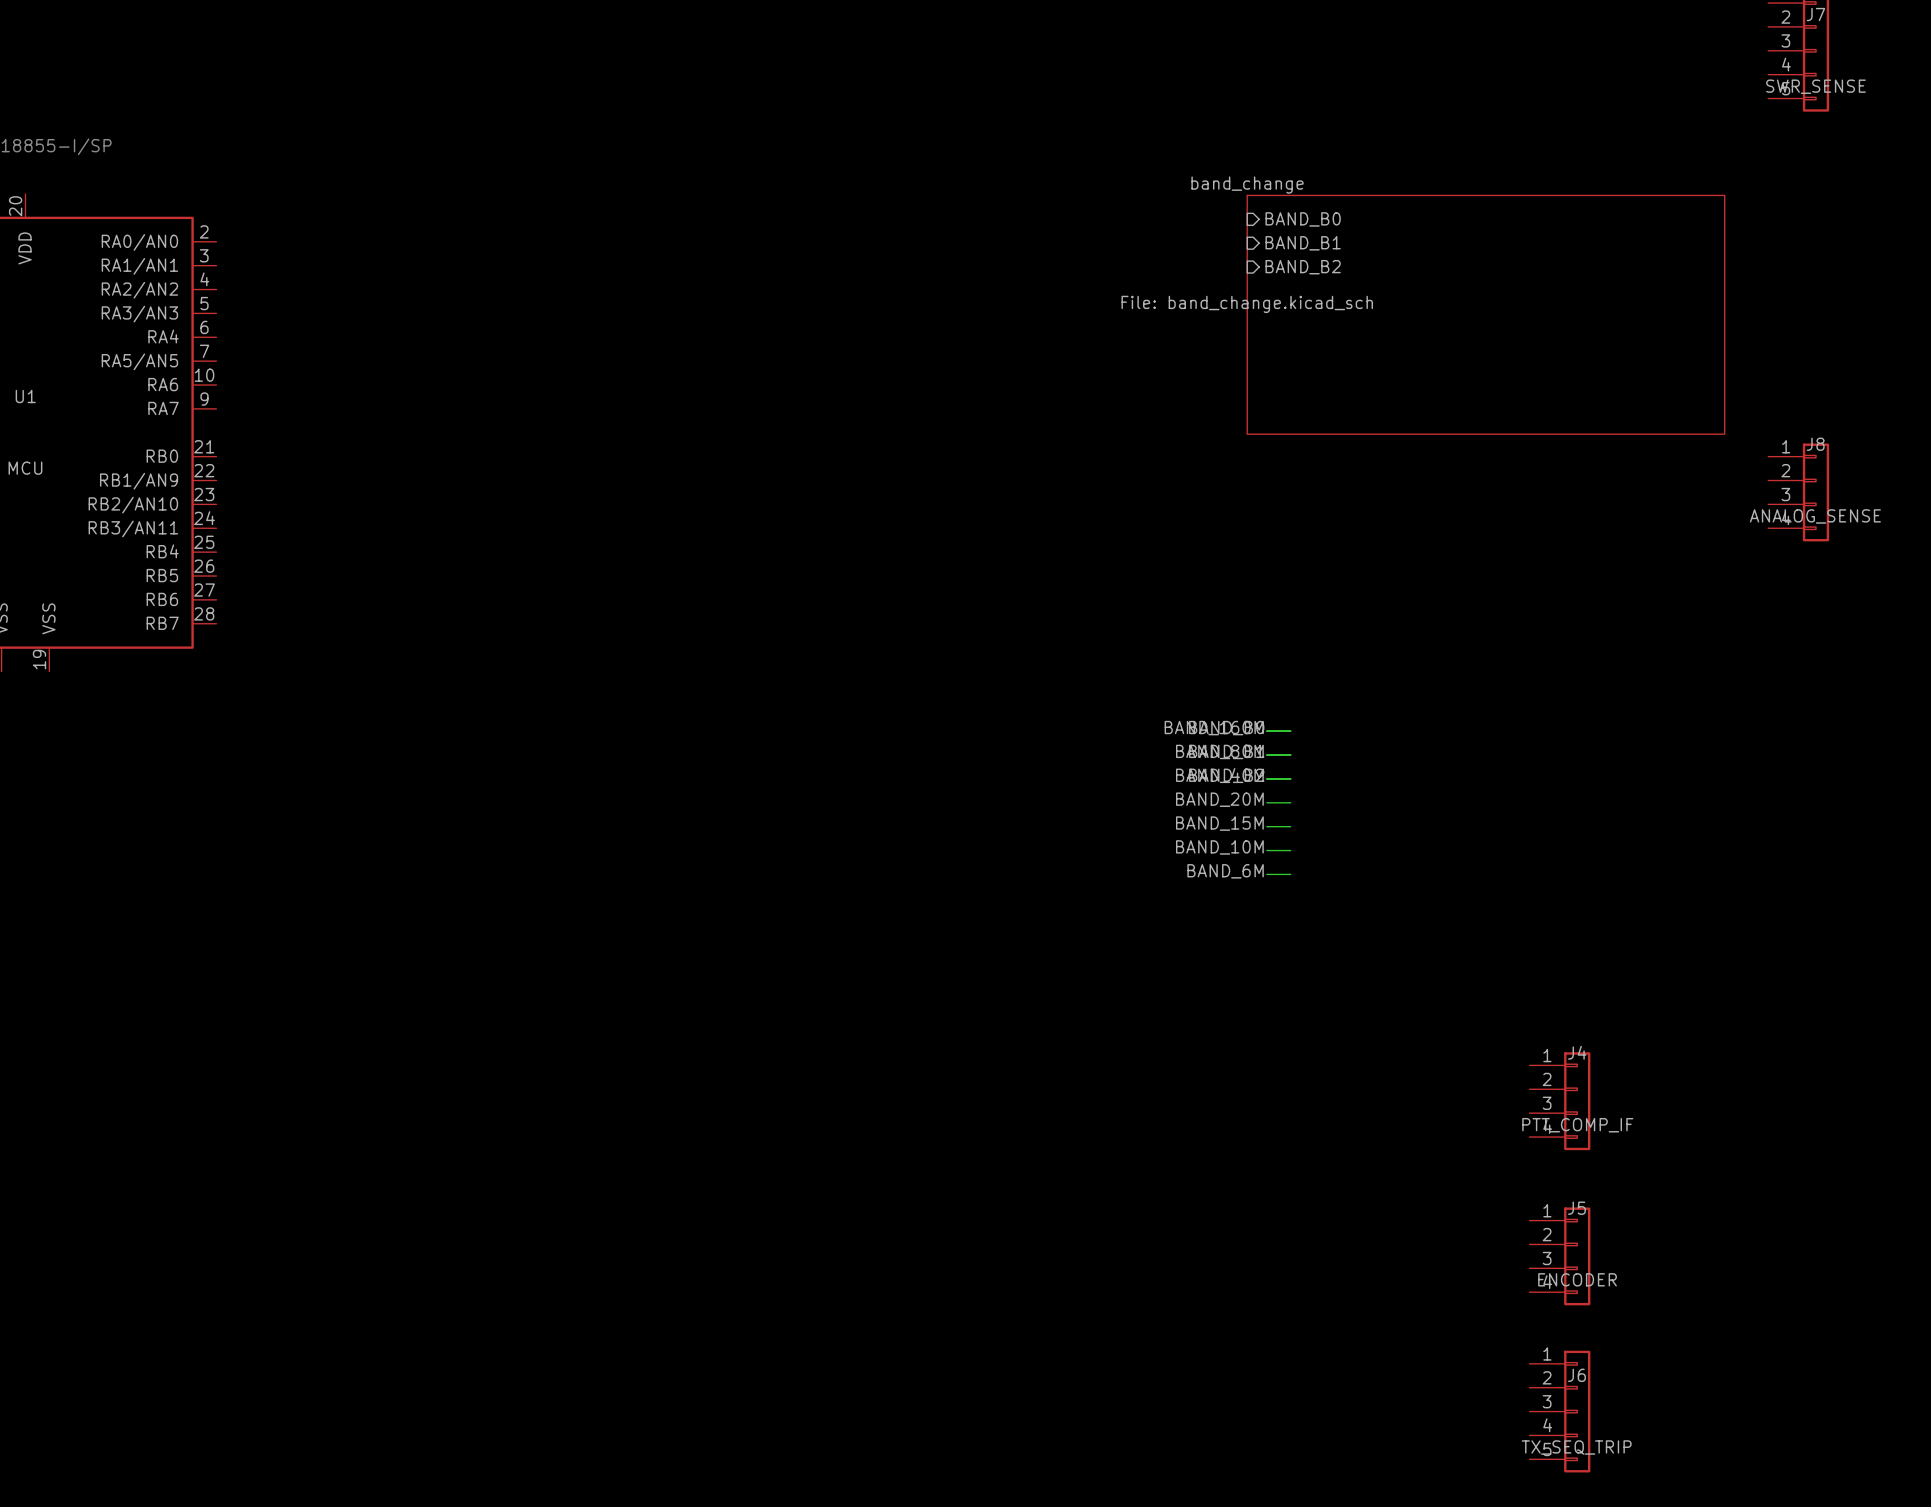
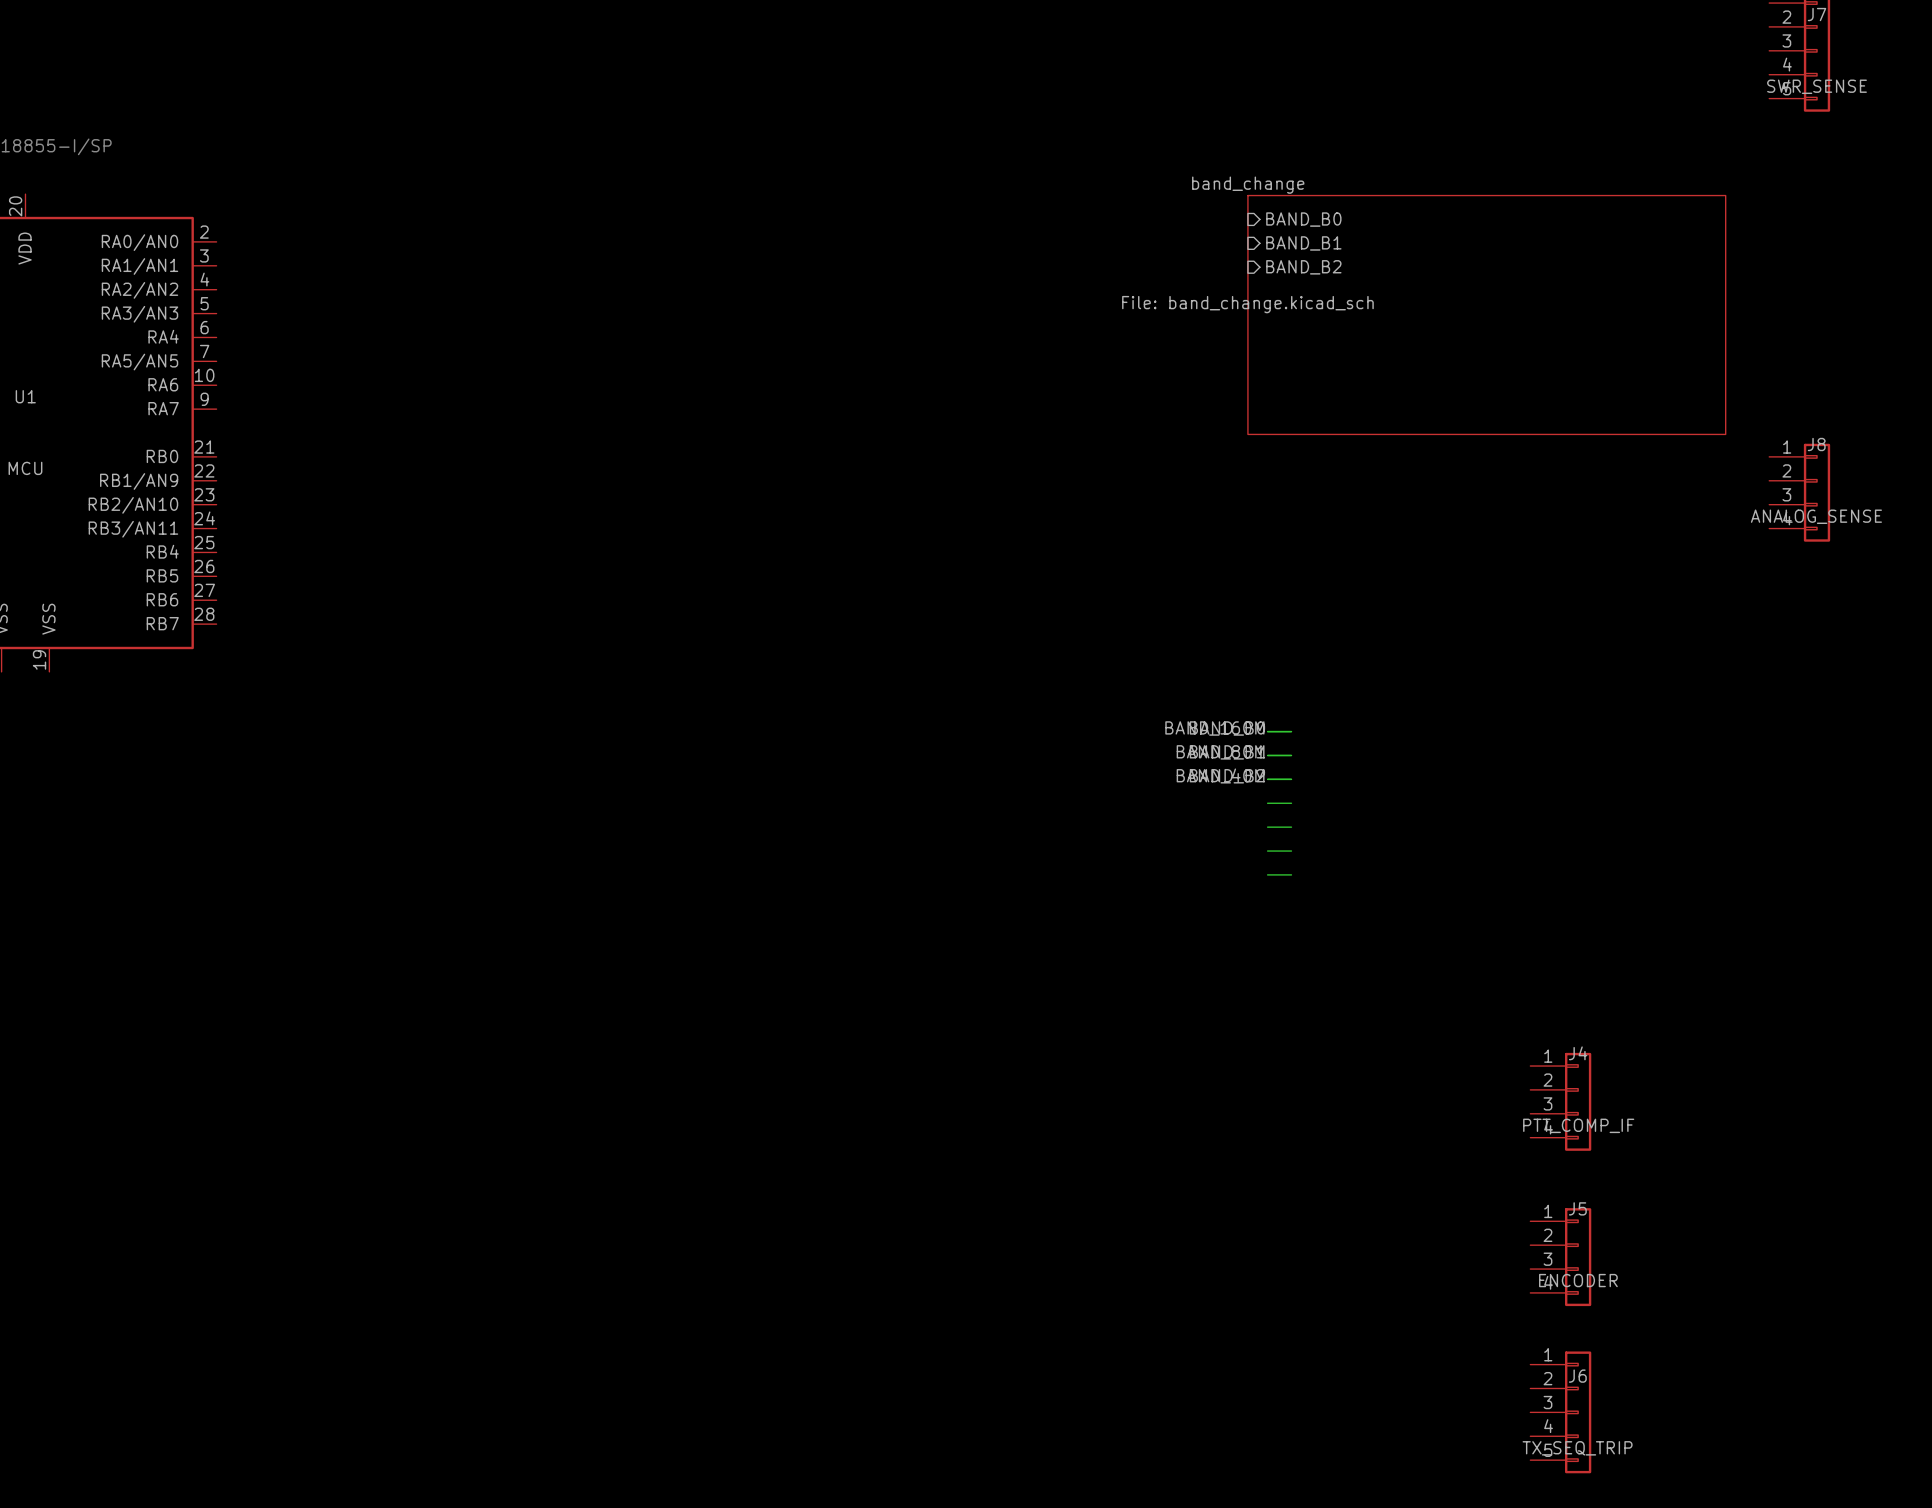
label: BAND_20M (1219, 799) -> none
label: BAND_15M (1219, 823) -> none
label: BAND_10M (1219, 847) -> none
label: BAND_6M (1225, 871) -> none

